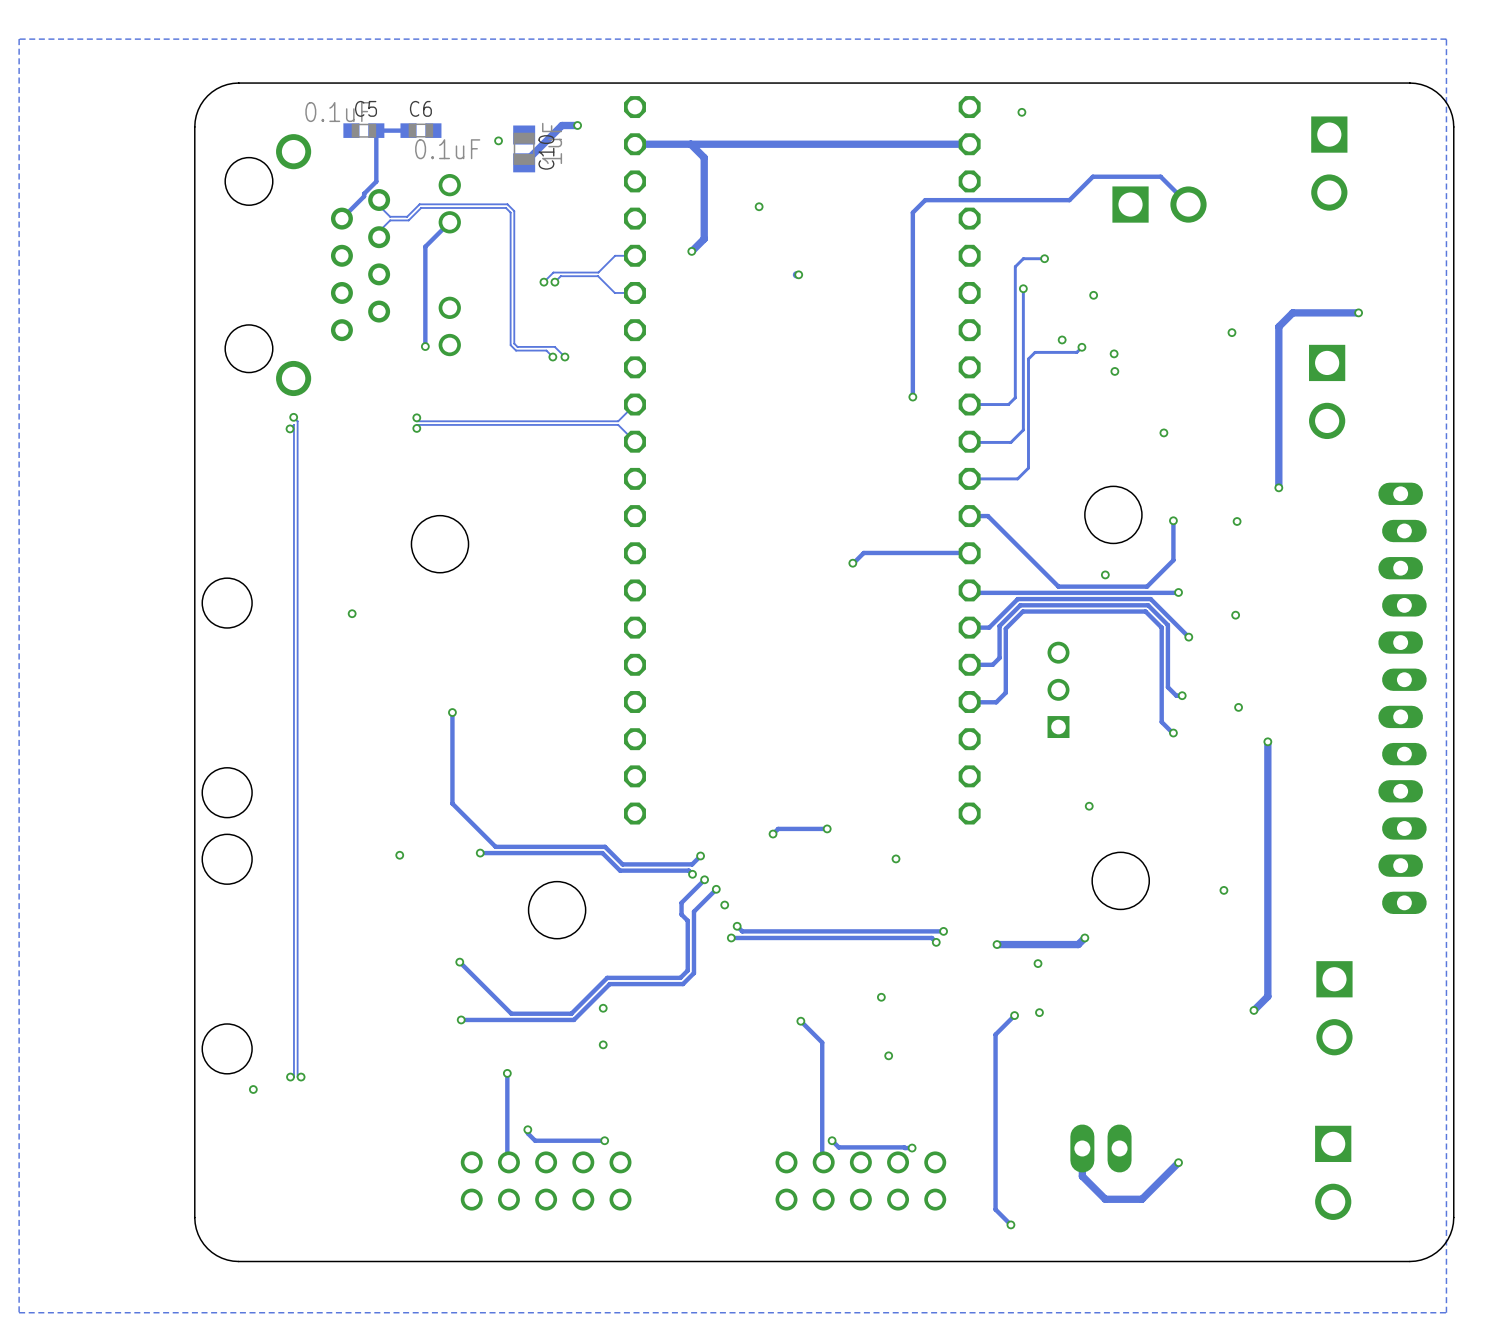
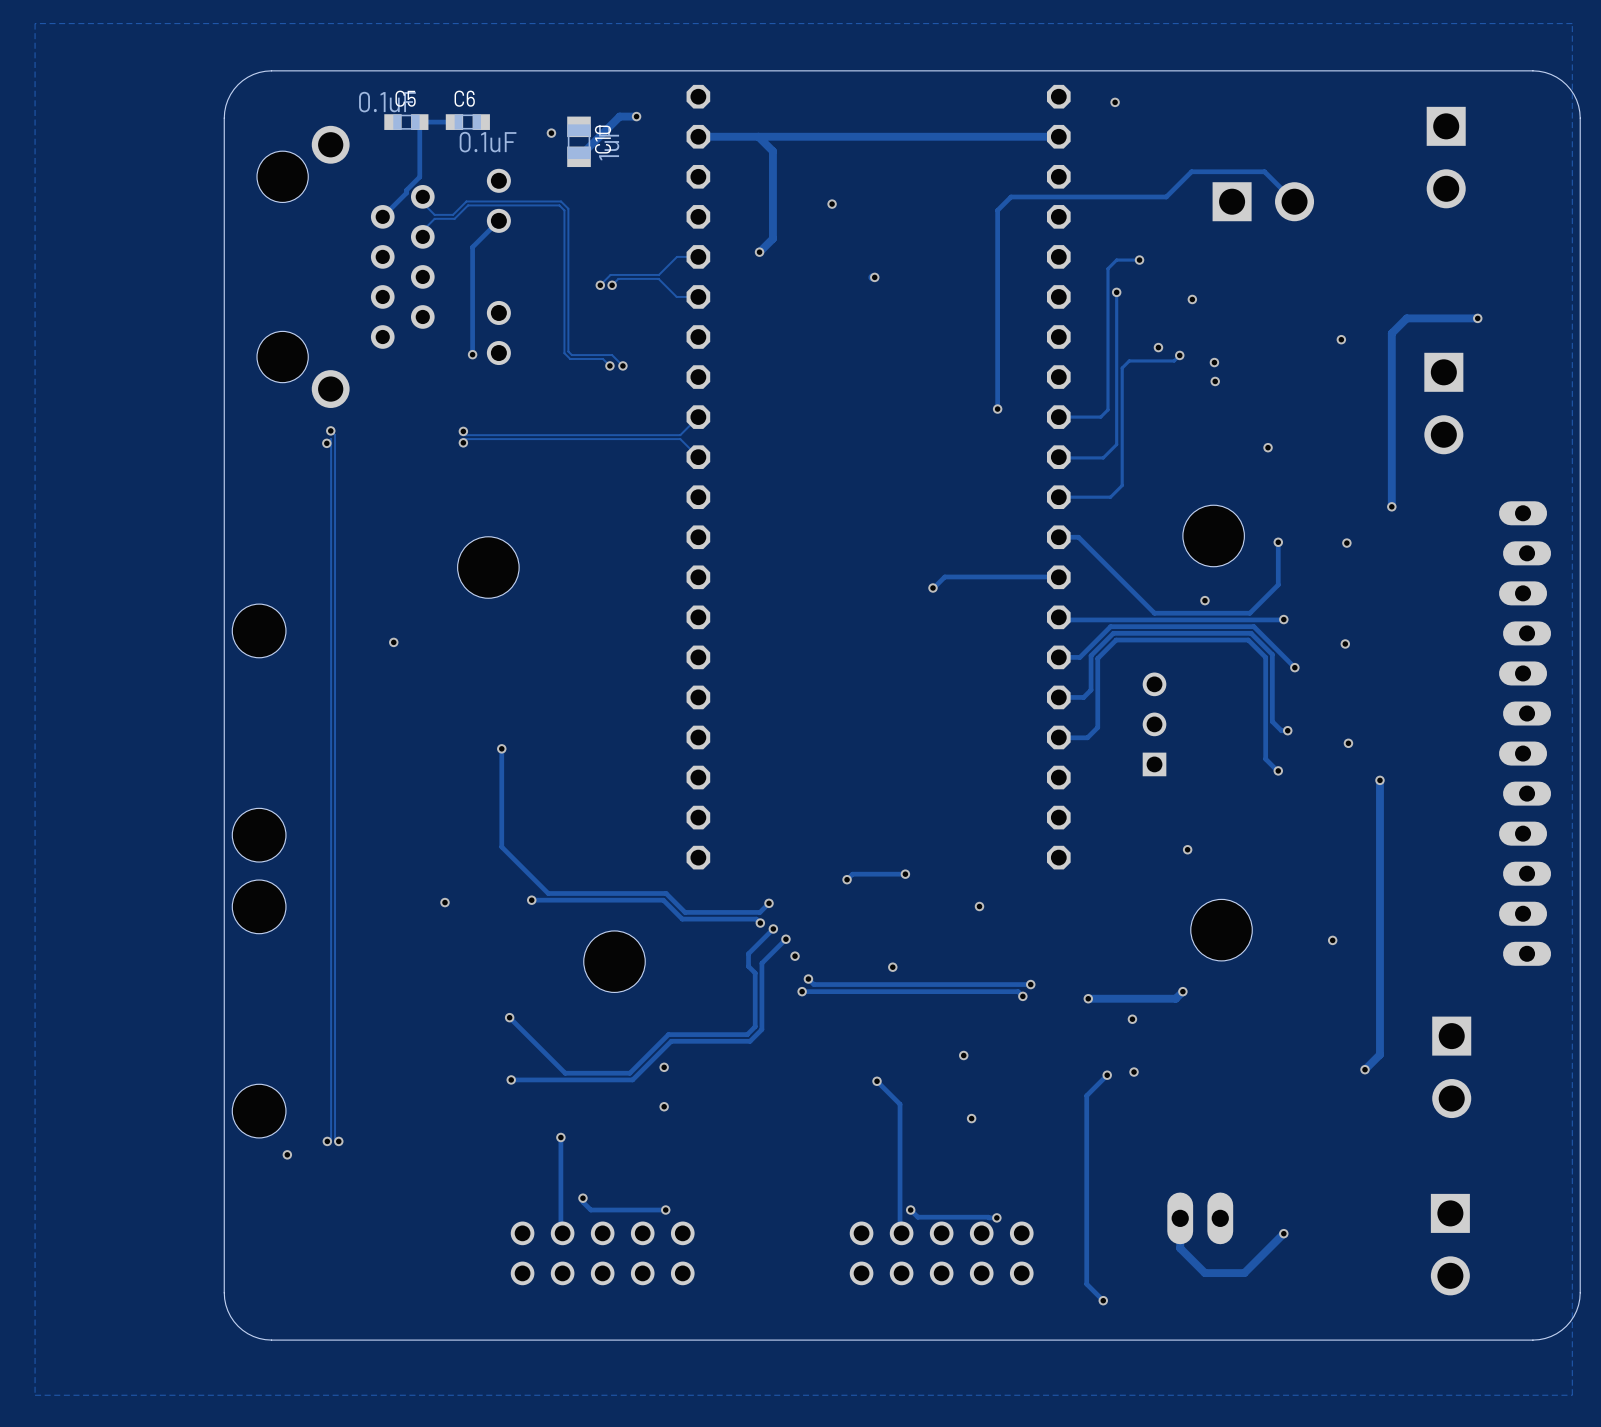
via: none -> (892, 967)

